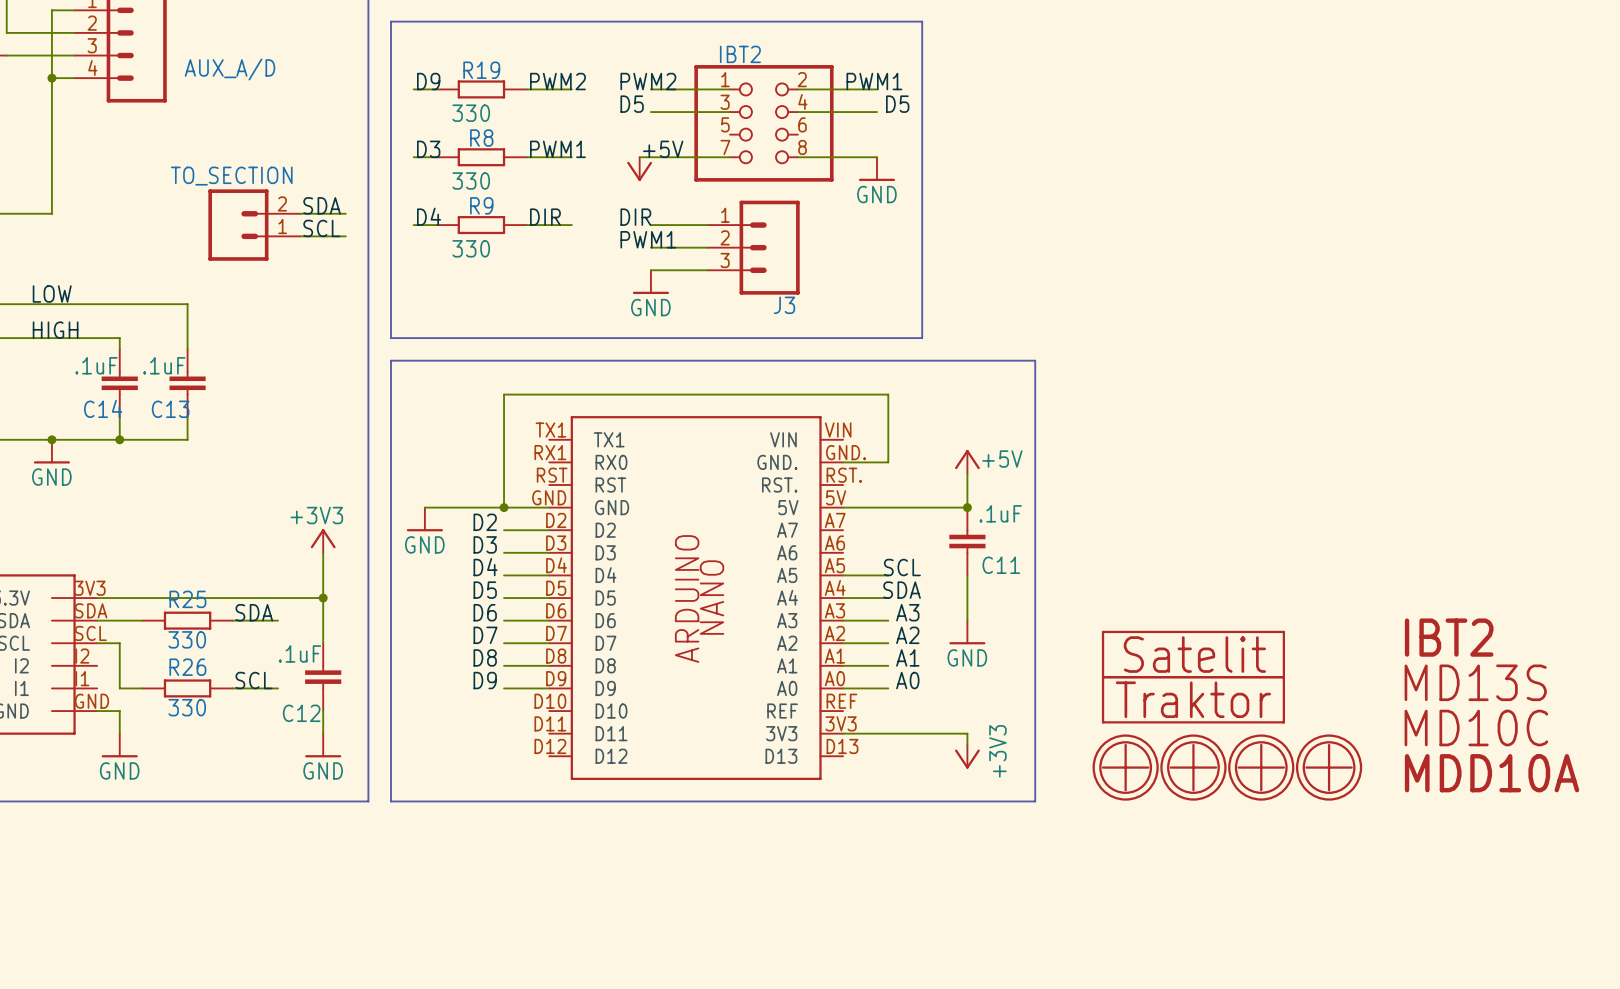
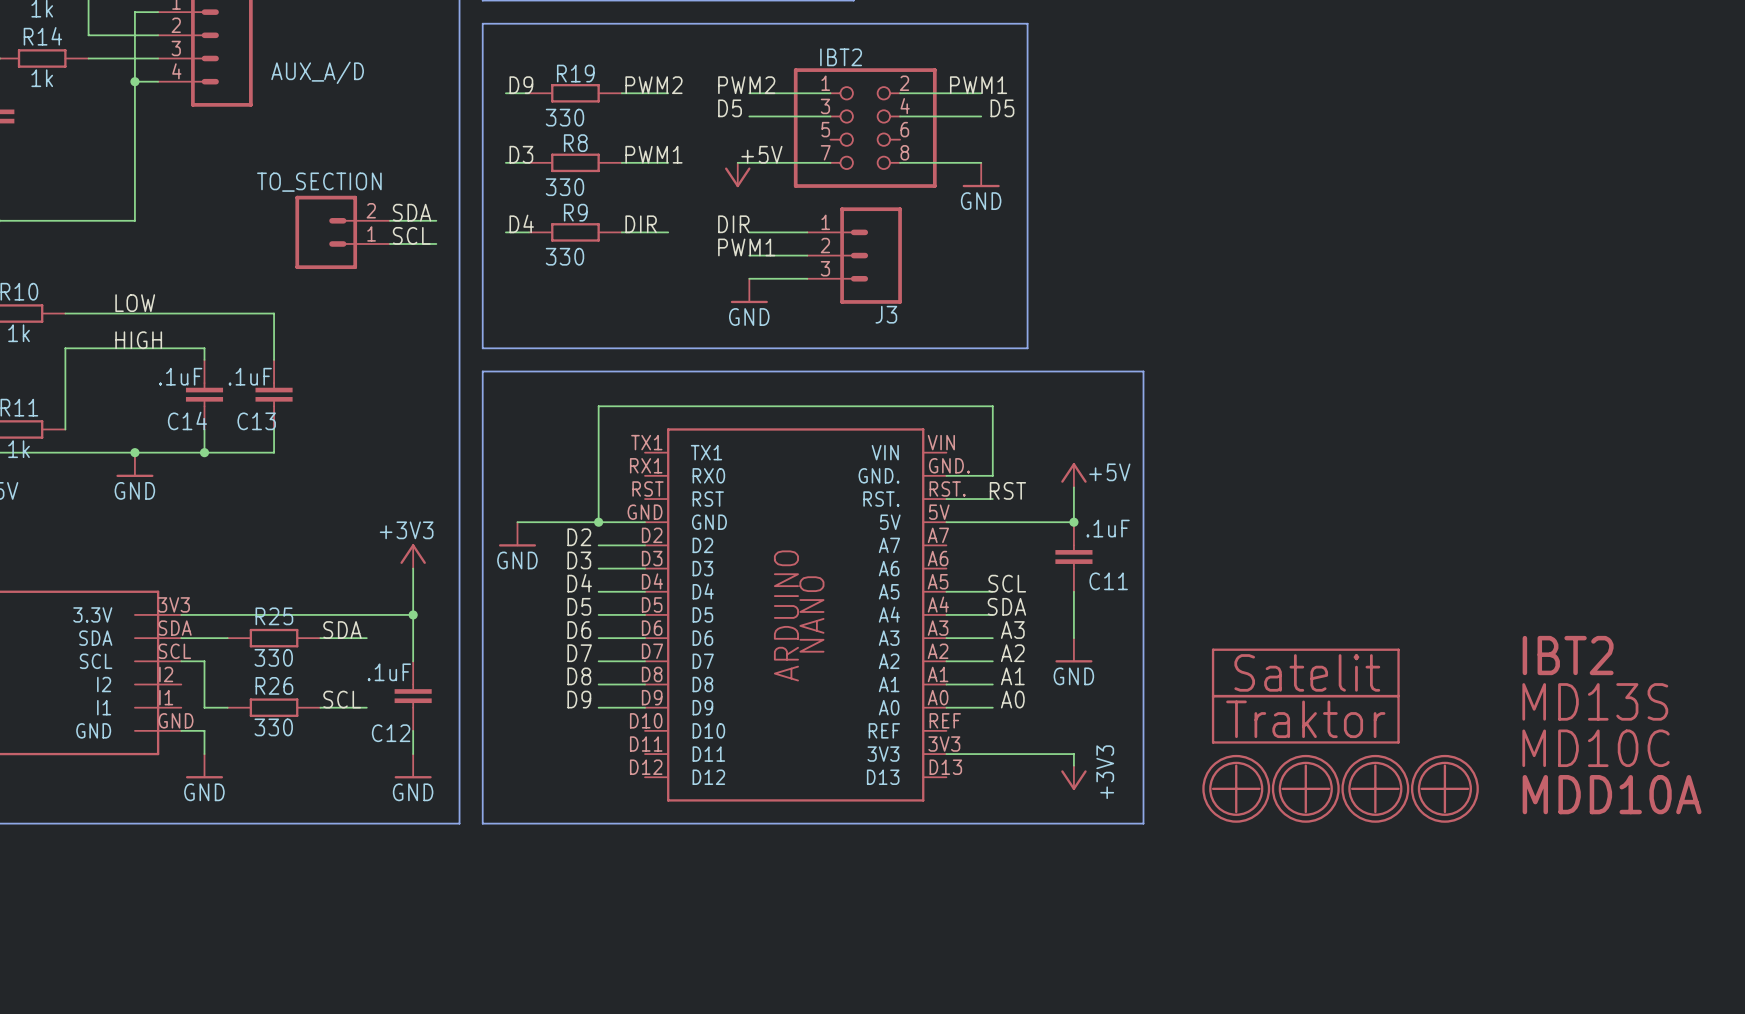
label: none -> RST (1007, 490)
wire: none -> (946, 499) (992, 499)

